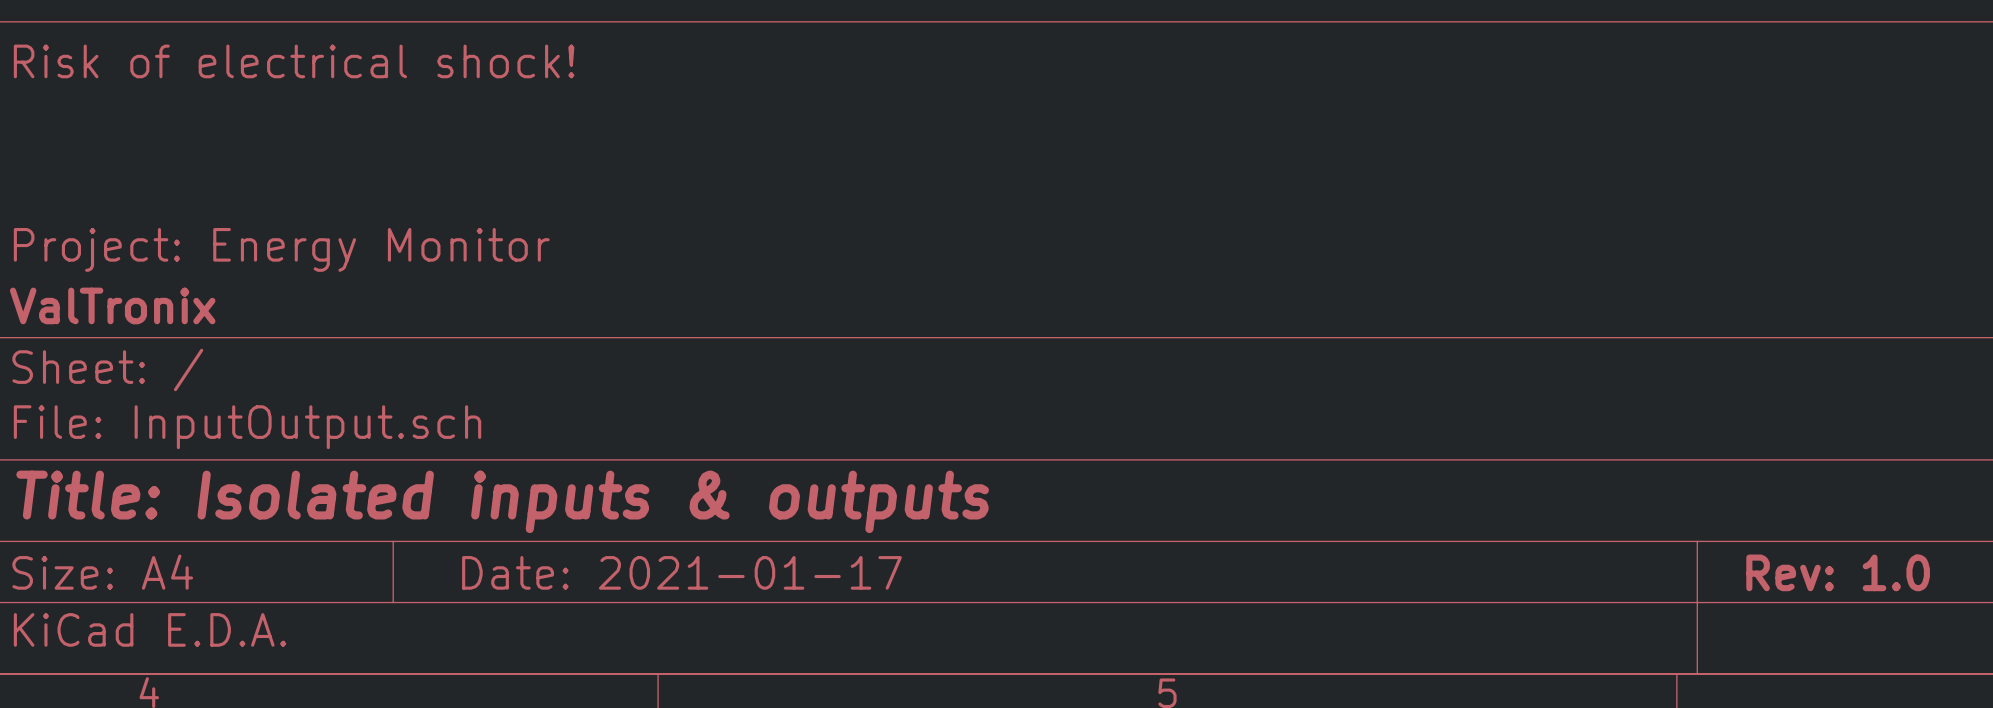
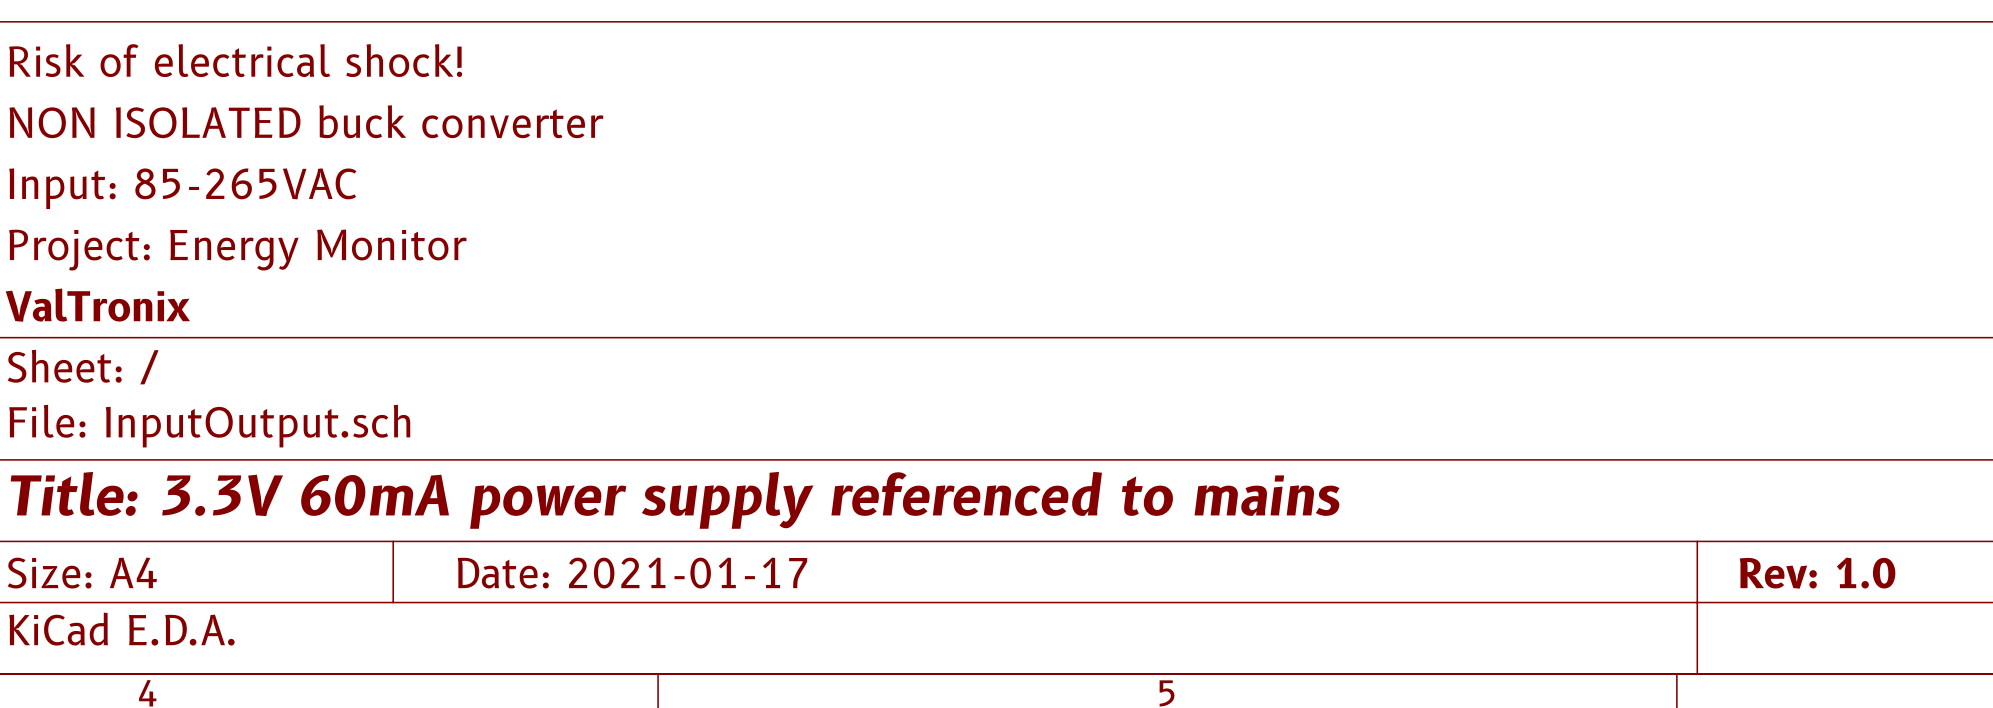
title block: none -> NON ISOLATED buck converter (306, 121)
title block: none -> Input: 85-265VAC (182, 188)
title block: Title: Isolated inputs & outputs (502, 501) -> Title: 3.3V 60mA power supply referenced to mains (675, 500)

